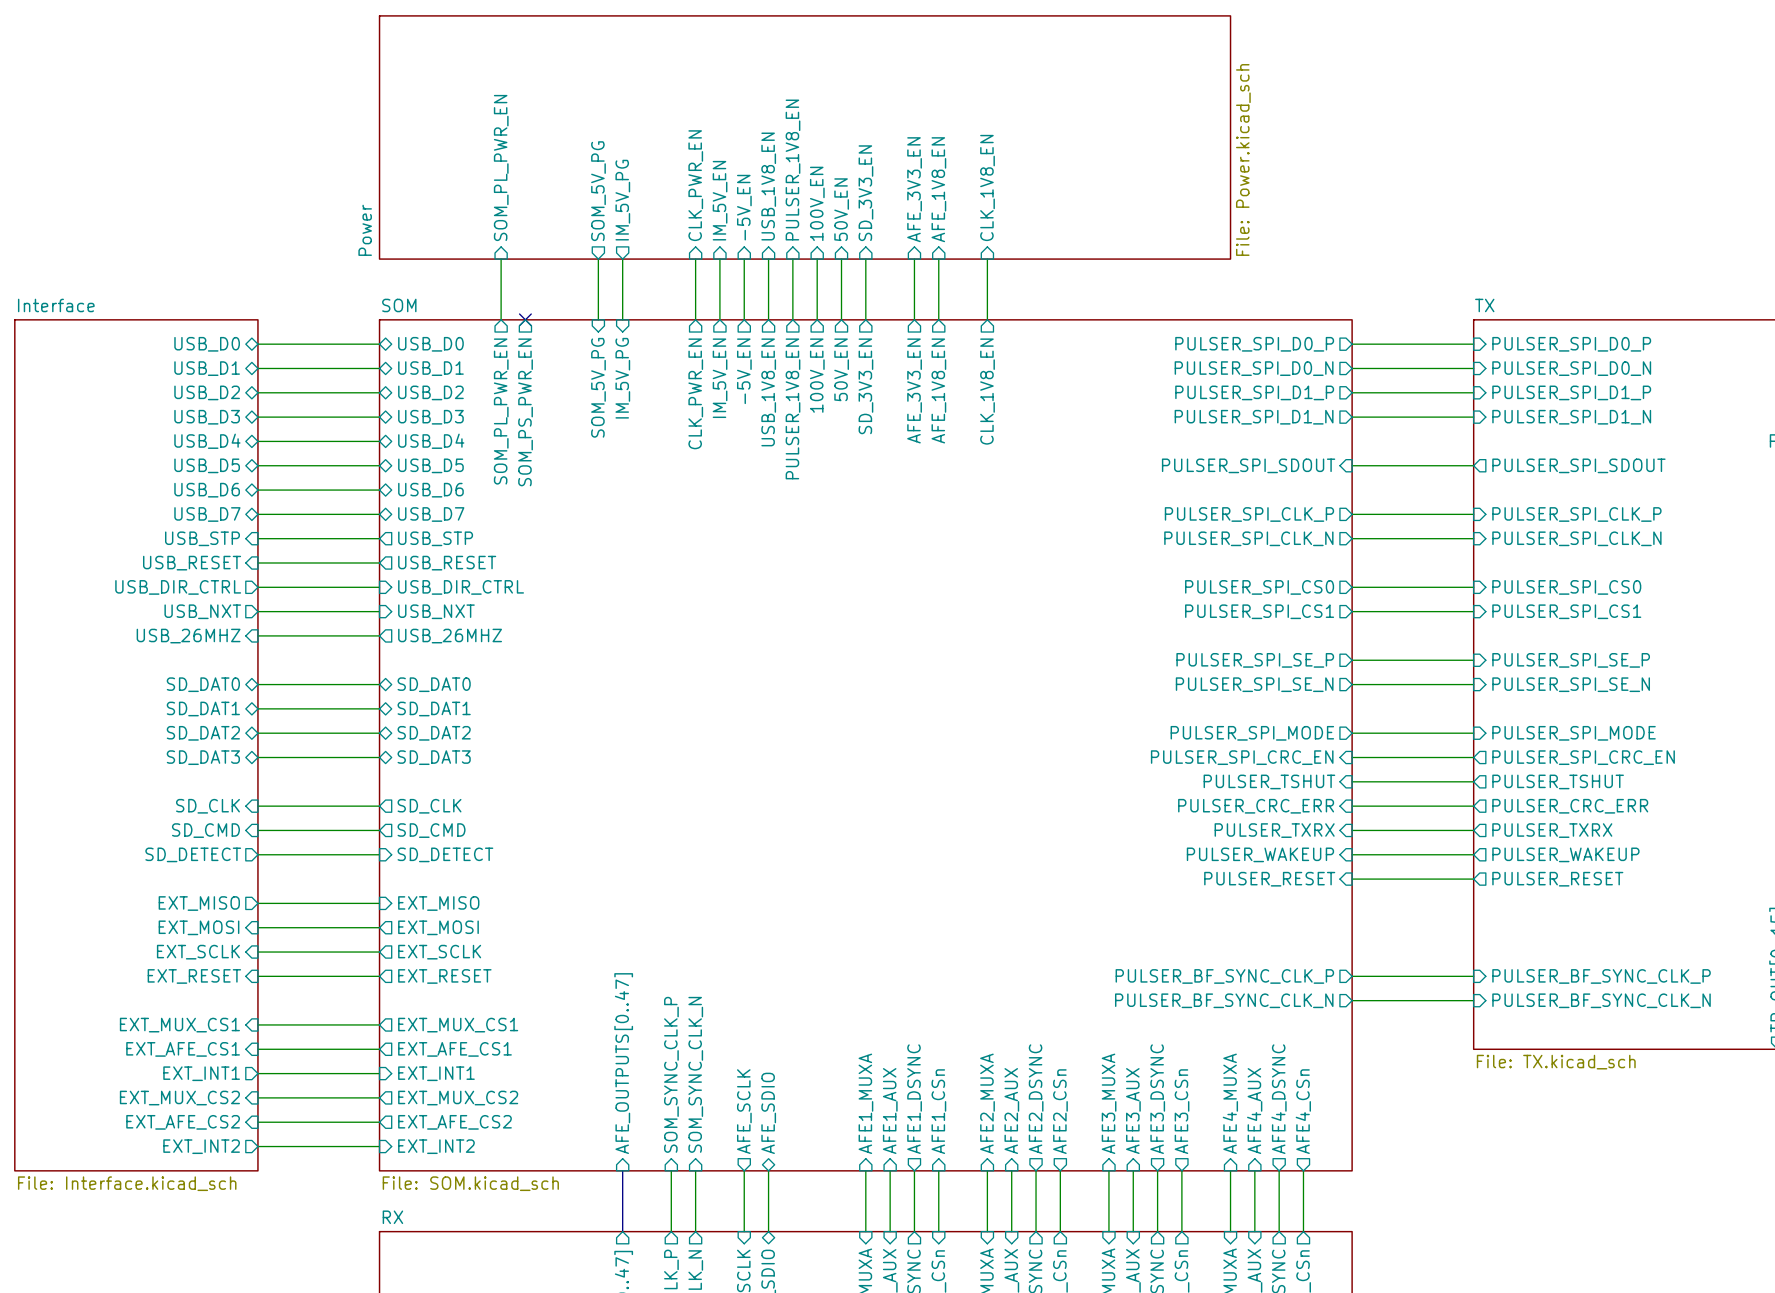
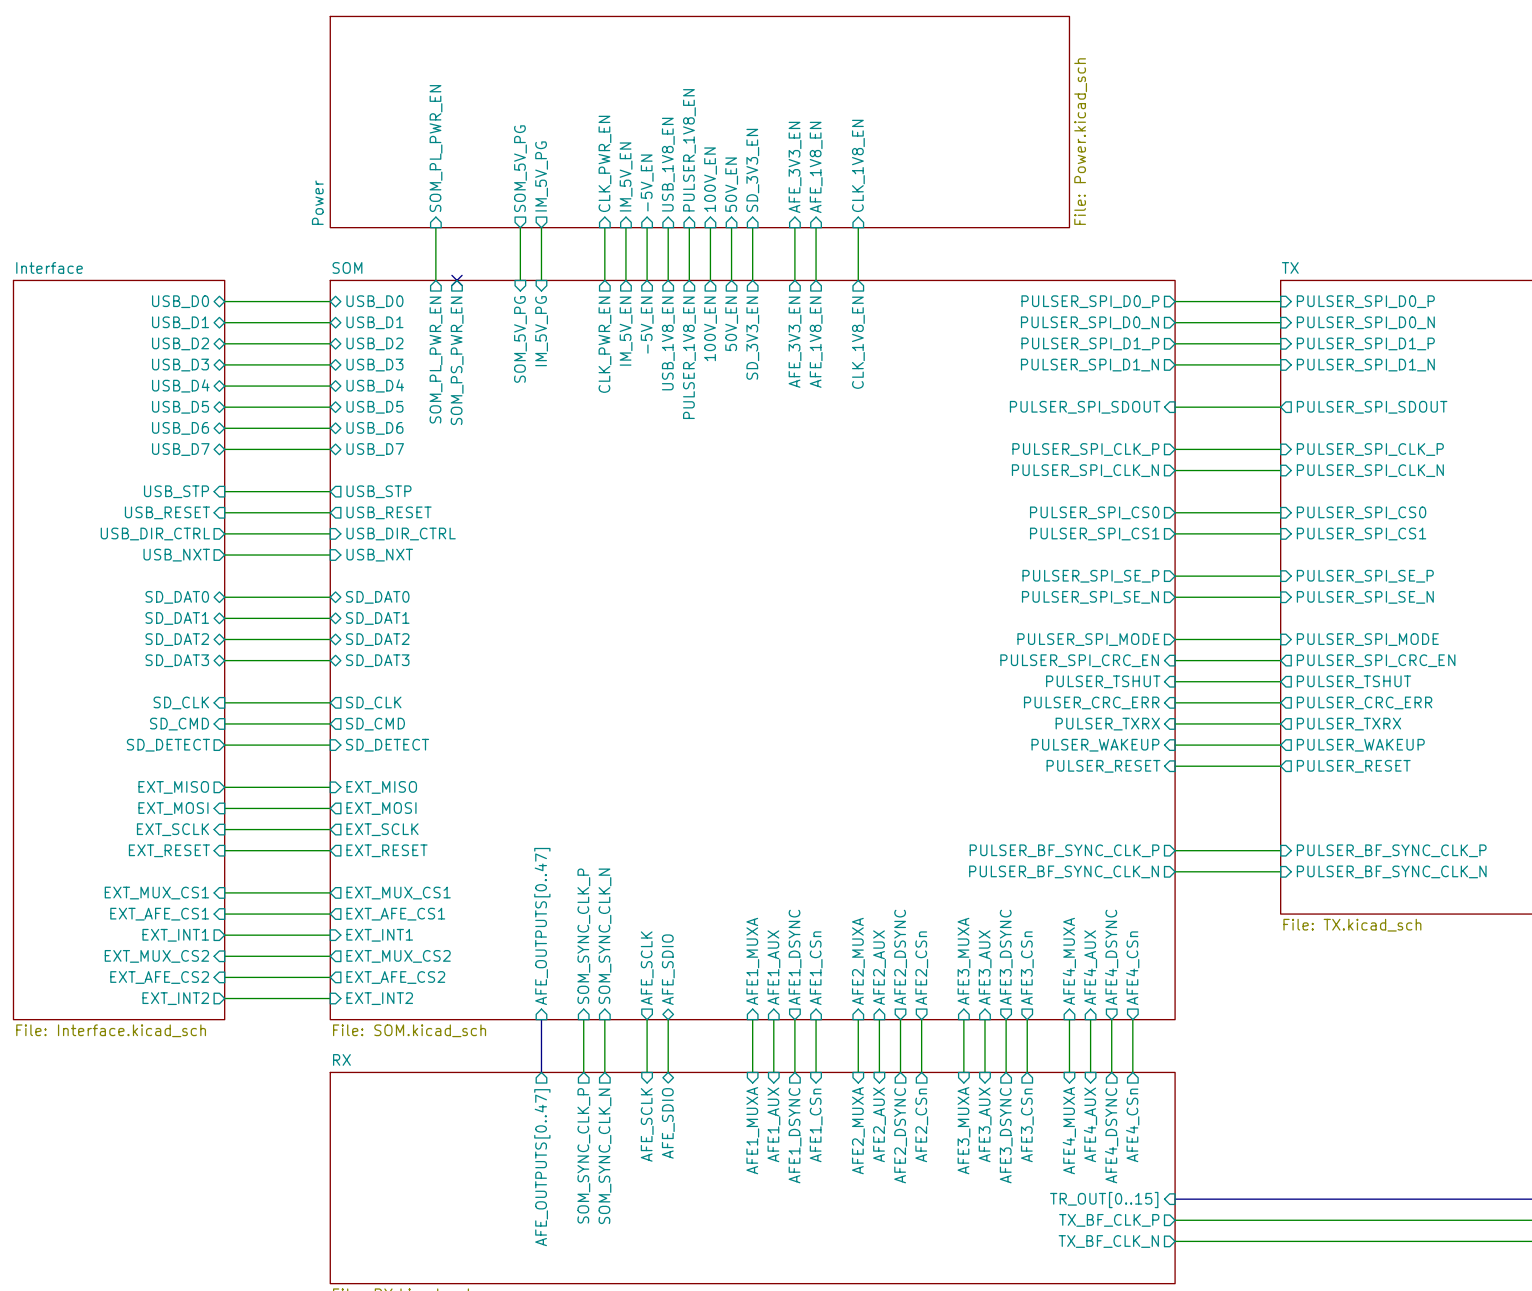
sheet pin: USB_STP (202, 538) -> none
wire: (257, 538) (379, 538) -> none
sheet pin: USB_STP (435, 538) -> none
sheet pin: USB_RESET (192, 563) -> USB_STP (176, 491)
sheet pin: USB_RESET (447, 563) -> USB_STP (378, 491)
sheet pin shape: output (178, 587) -> input (167, 512)
sheet pin: USB_DIR_CTRL (178, 587) -> USB_RESET (167, 512)
sheet pin shape: input (461, 587) -> output (389, 512)
sheet pin: USB_DIR_CTRL (461, 587) -> USB_RESET (389, 512)
sheet pin: USB_NXT (202, 611) -> USB_DIR_CTRL (155, 533)
sheet pin: USB_NXT (436, 611) -> USB_DIR_CTRL (401, 533)
sheet pin shape: input (188, 636) -> output (176, 555)
sheet pin: USB_26MHZ (188, 636) -> USB_NXT (176, 555)
sheet pin shape: output (450, 636) -> input (379, 555)
sheet pin: USB_26MHZ (450, 636) -> USB_NXT (379, 555)

